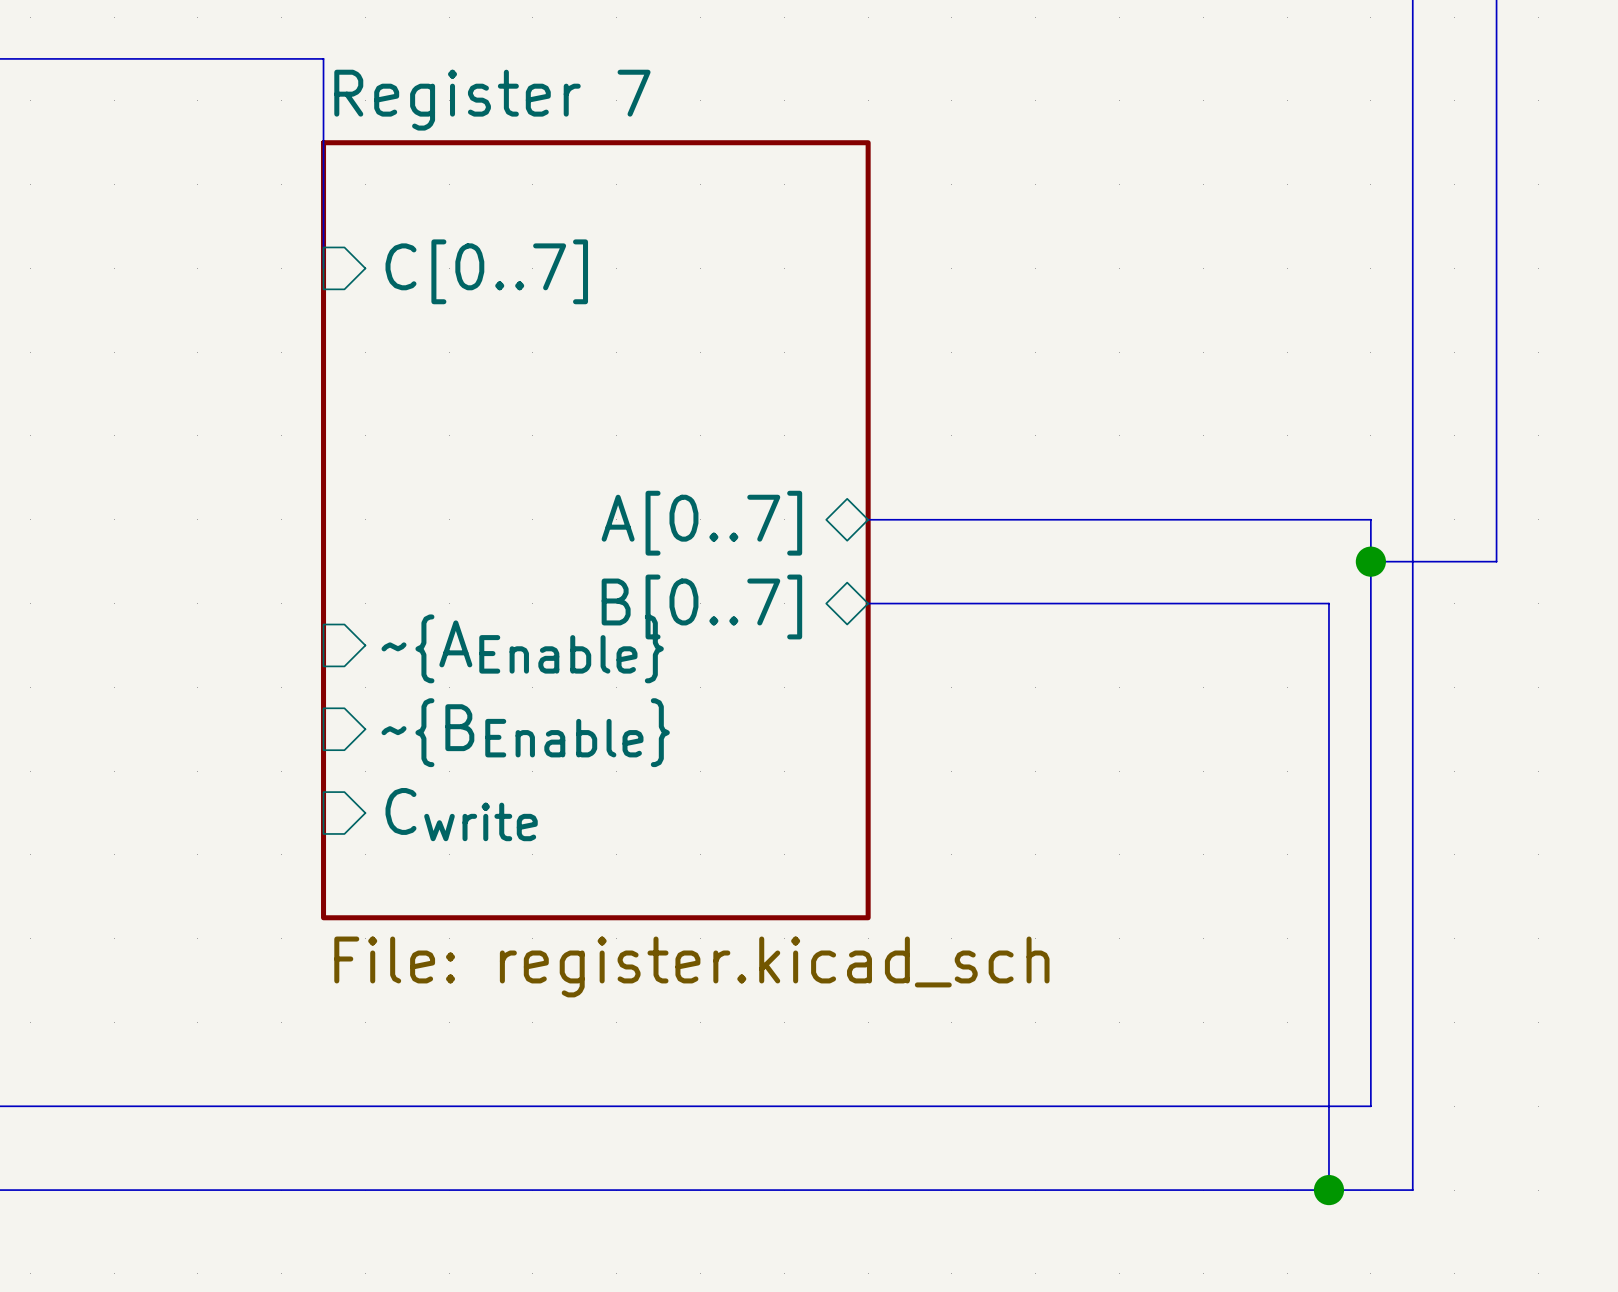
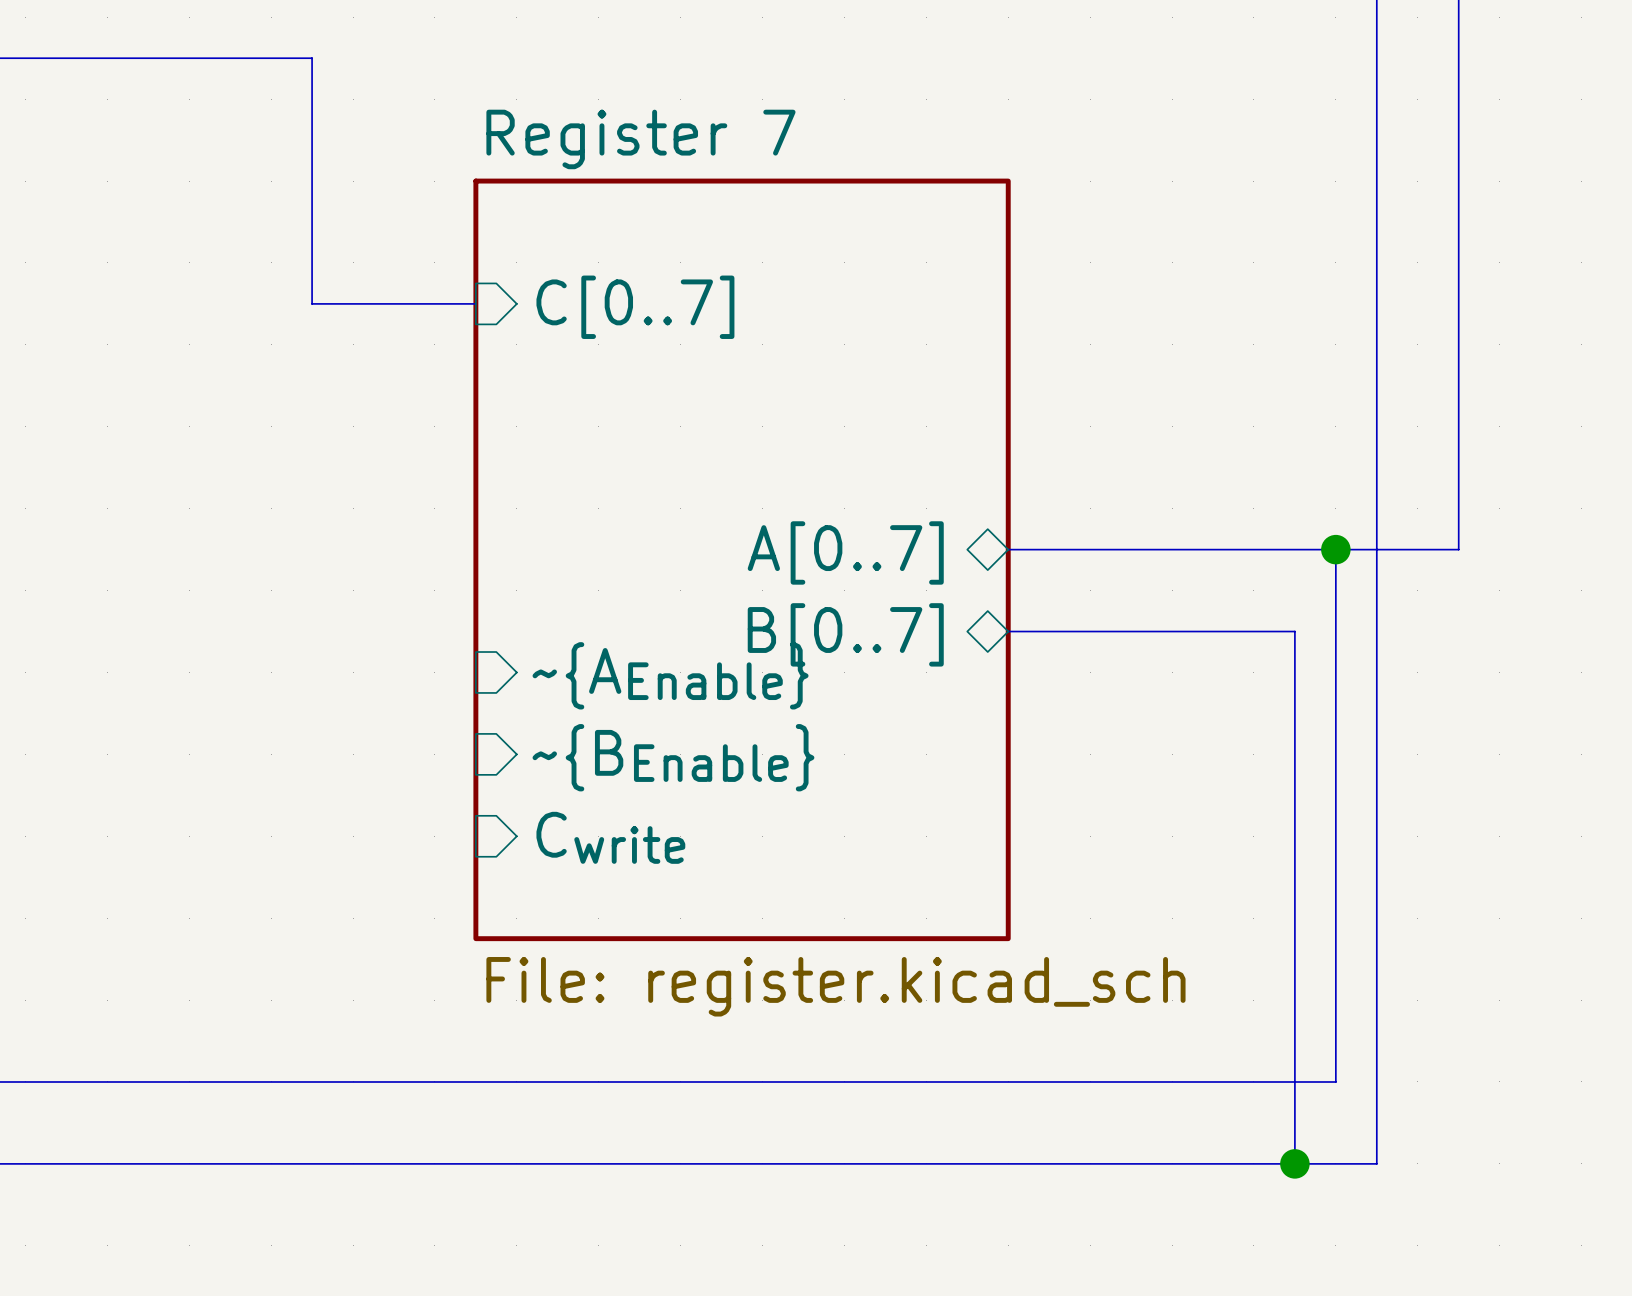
bus: none -> (312, 262) (312, 303) (475, 303)
sheet pin position: C[0..7] (486, 271) -> C[0..7] (635, 307)
bus: (868, 519) (1370, 519) (1370, 561) -> (1008, 549) (1335, 549)
sheet pin position: A[0..7] (701, 523) -> A[0..7] (845, 552)
sheet Register 7 position: (595, 530) -> (742, 559)
bus: (868, 603) (1328, 603) (1328, 645) -> (1008, 631) (1294, 631)
sheet pin position: B[0..7] (701, 606) -> B[0..7] (845, 634)
sheet pin position: ~{AEnable} (522, 648) -> ~{AEnable} (670, 675)
sheet pin position: ~{BEnable} (525, 732) -> ~{BEnable} (673, 757)
sheet pin position: Cwrite (461, 814) -> Cwrite (610, 837)

